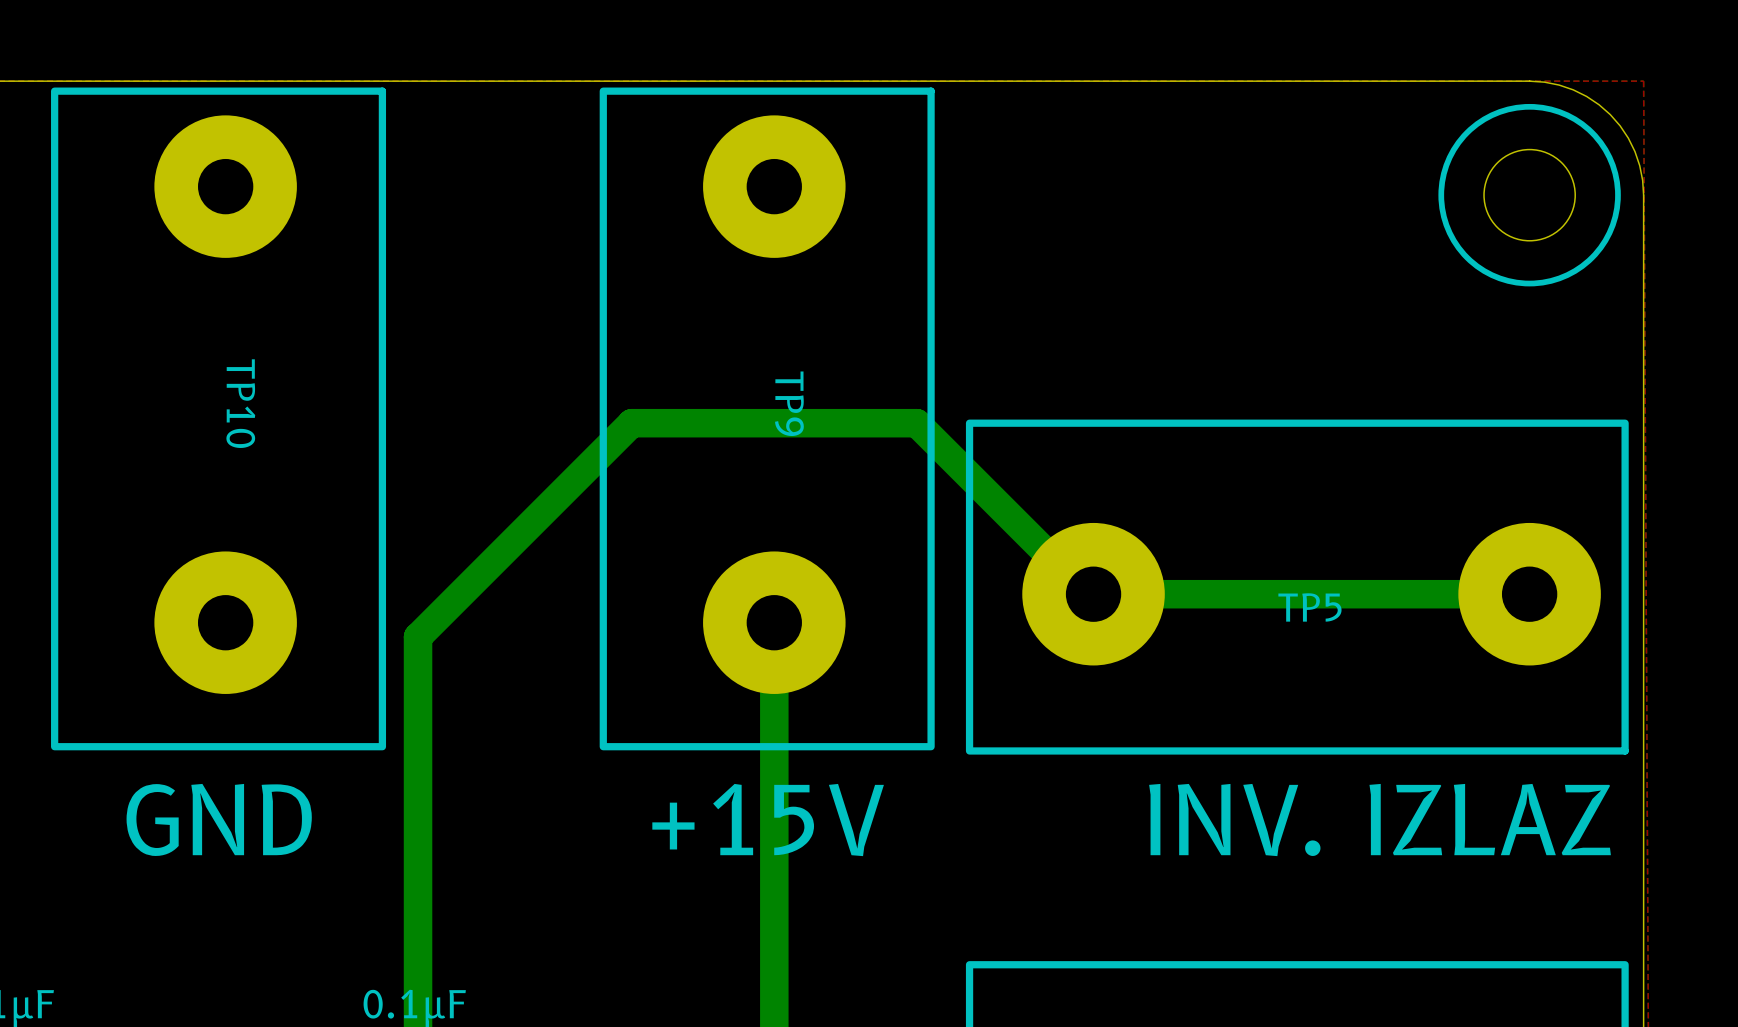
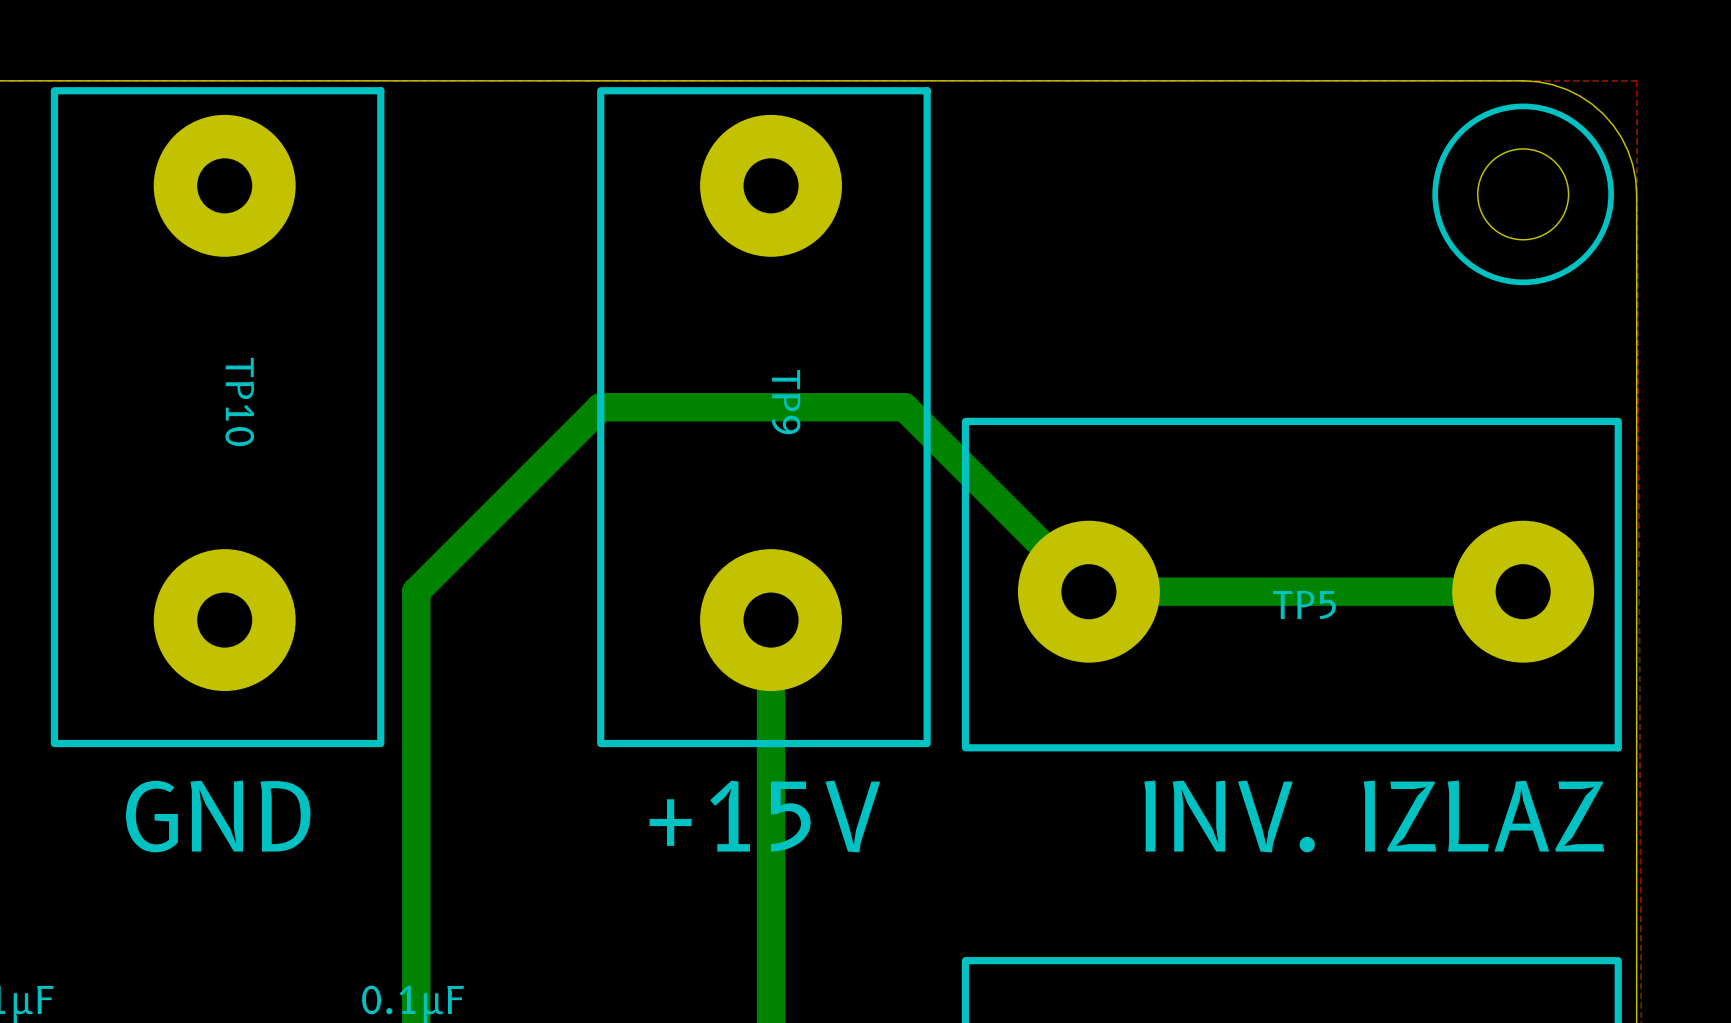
bottom track: (1093, 594) (1087, 594) (916, 423) (631, 423) (418, 636) -> (1088, 591) (904, 407) (600, 407) (416, 591) (416, 634)

